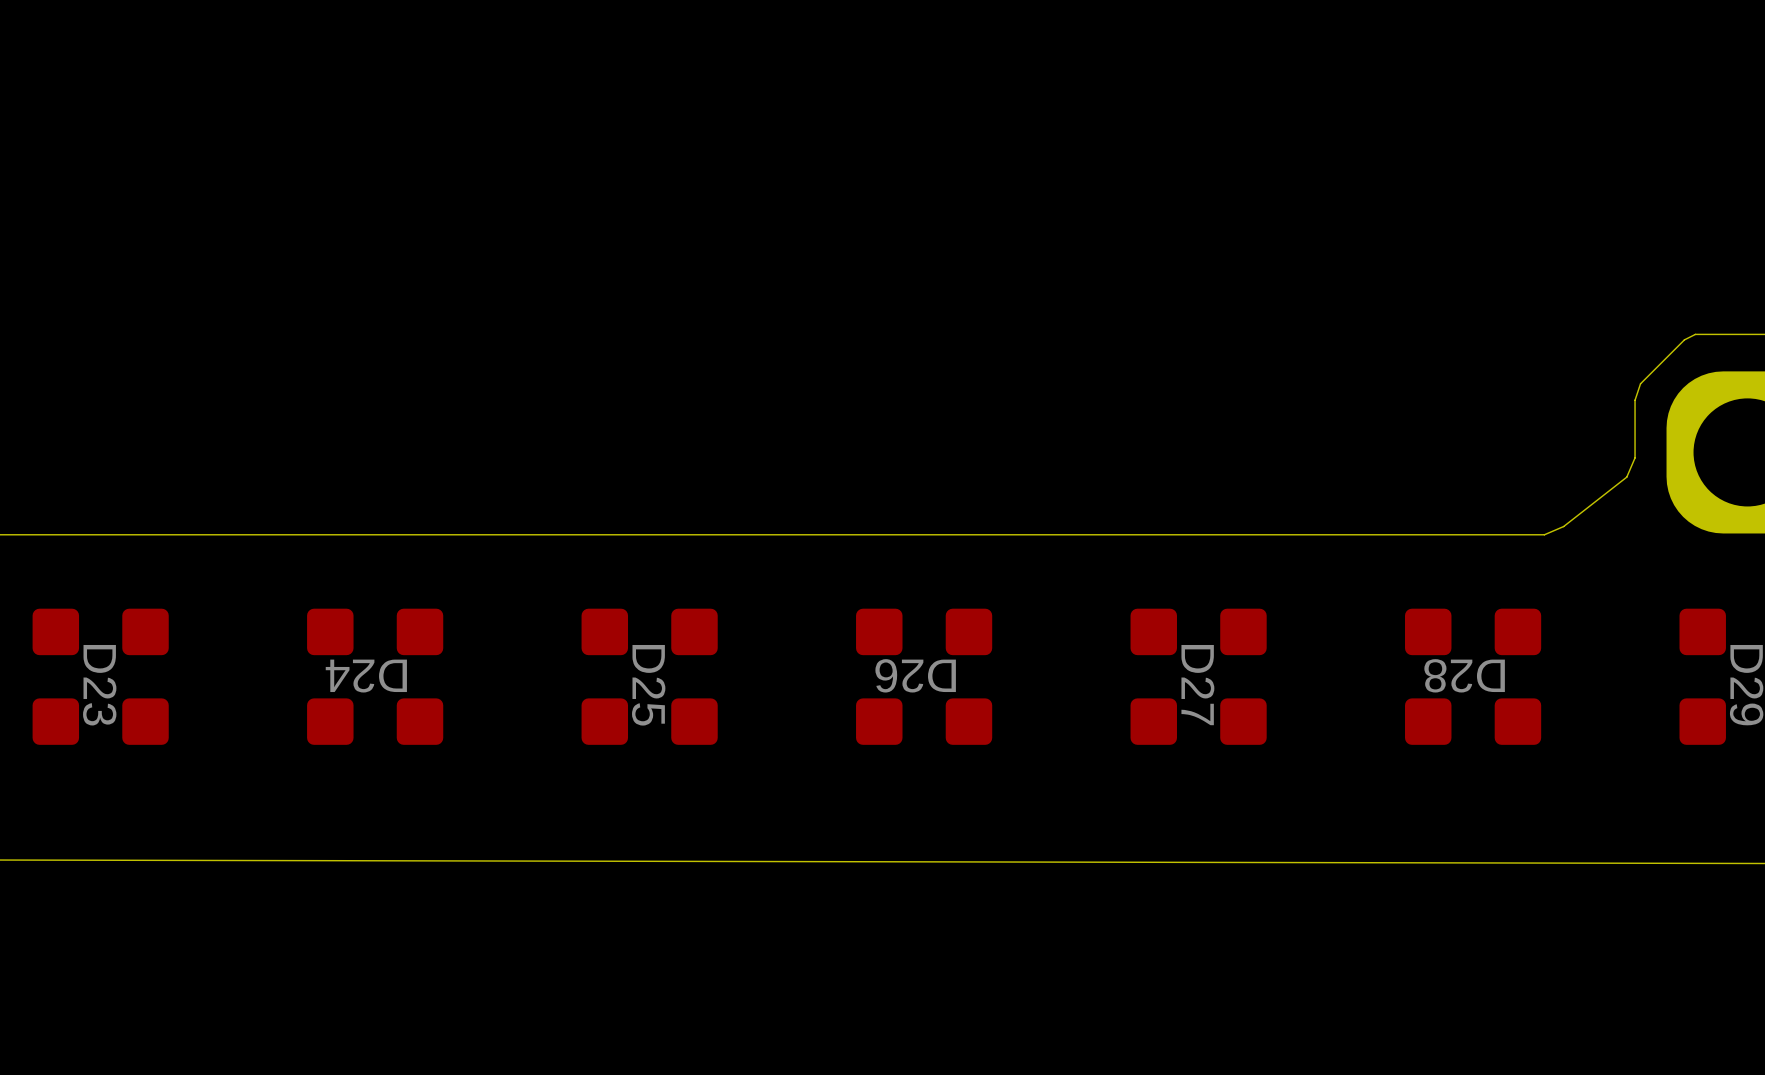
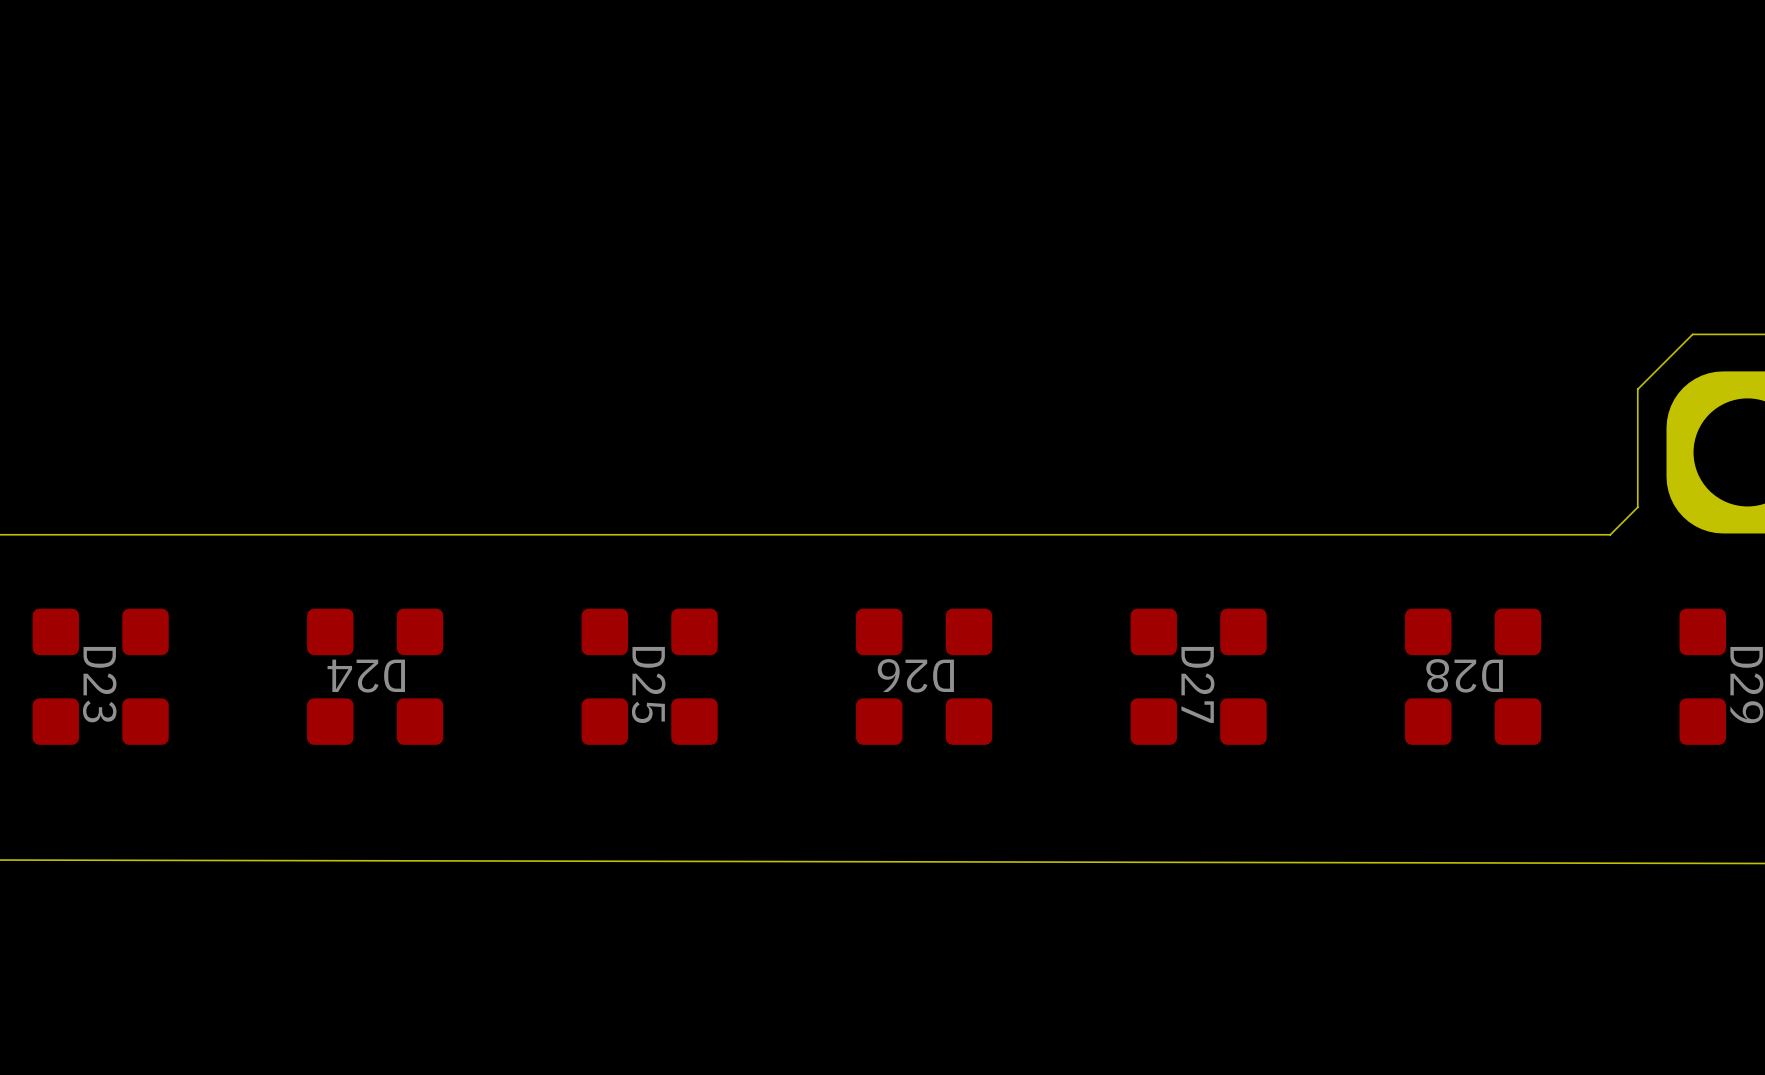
board edge: (1695, 334) (1684, 339) (1640, 383) (1635, 400) (1635, 457) (1626, 477) (1563, 526) (1544, 534) -> (1695, 334) (1692, 334) (1637, 389) (1637, 507) (1610, 534) (1544, 534)

